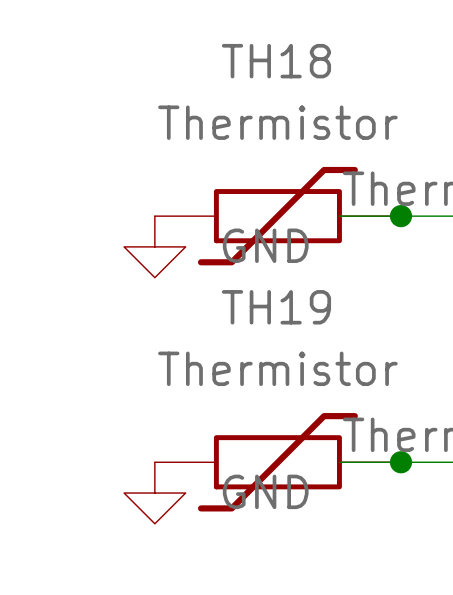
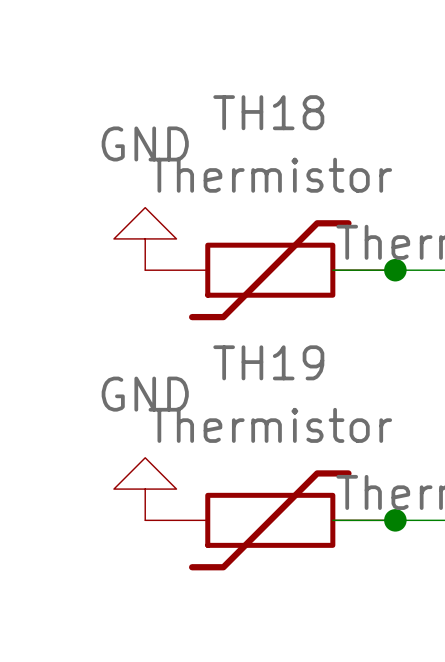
power symbol text position: GND (265, 245) -> GND (145, 143)
power symbol rotation: 0° (154, 246) -> 180° (145, 238)
power symbol position: GND (154, 246) -> GND (145, 238)
power symbol text position: GND (265, 491) -> GND (145, 394)
power symbol rotation: 0° (154, 493) -> 180° (145, 489)
power symbol position: GND (154, 493) -> GND (145, 489)

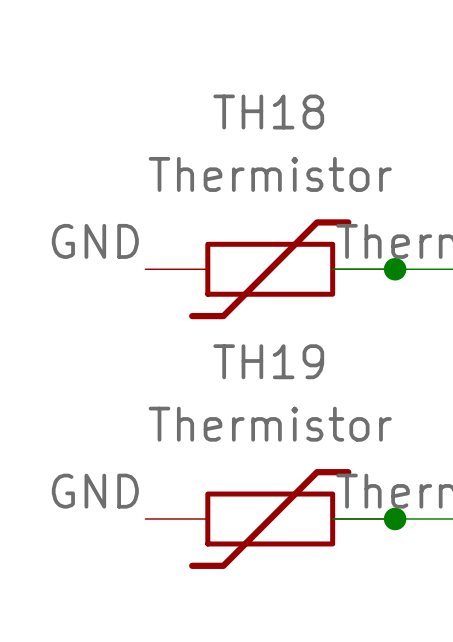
power symbol: GND (145, 238) -> none
label: none -> GND (95, 241)
power symbol: GND (145, 489) -> none
label: none -> GND (95, 491)

